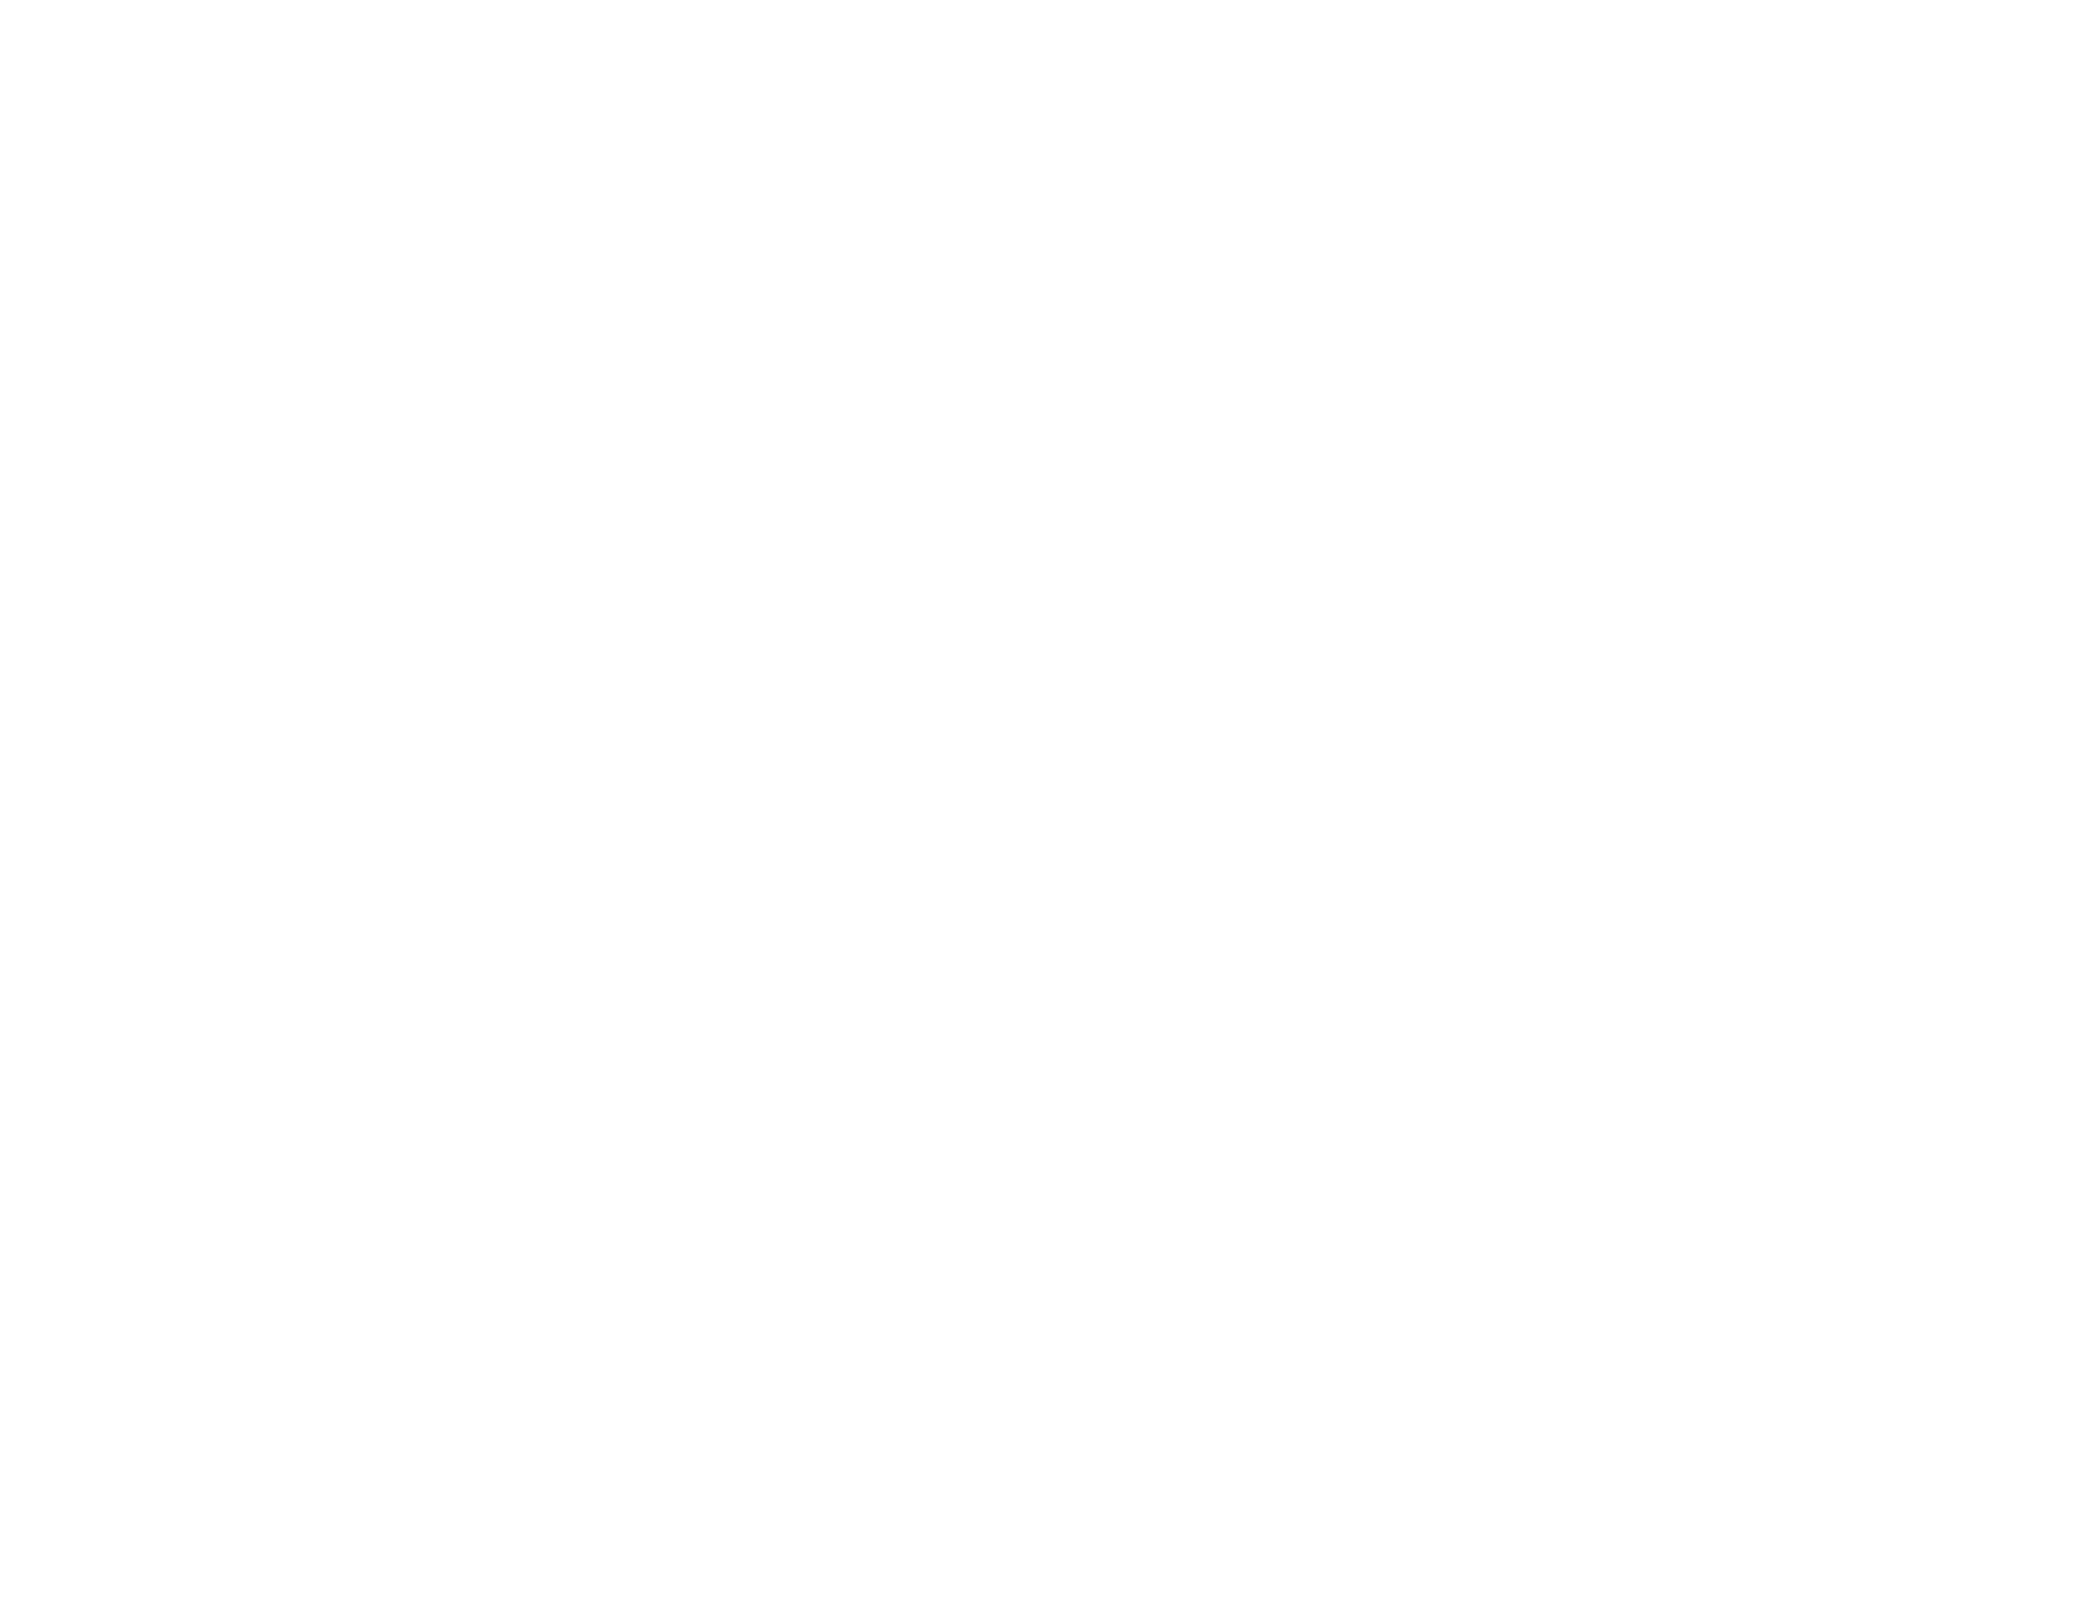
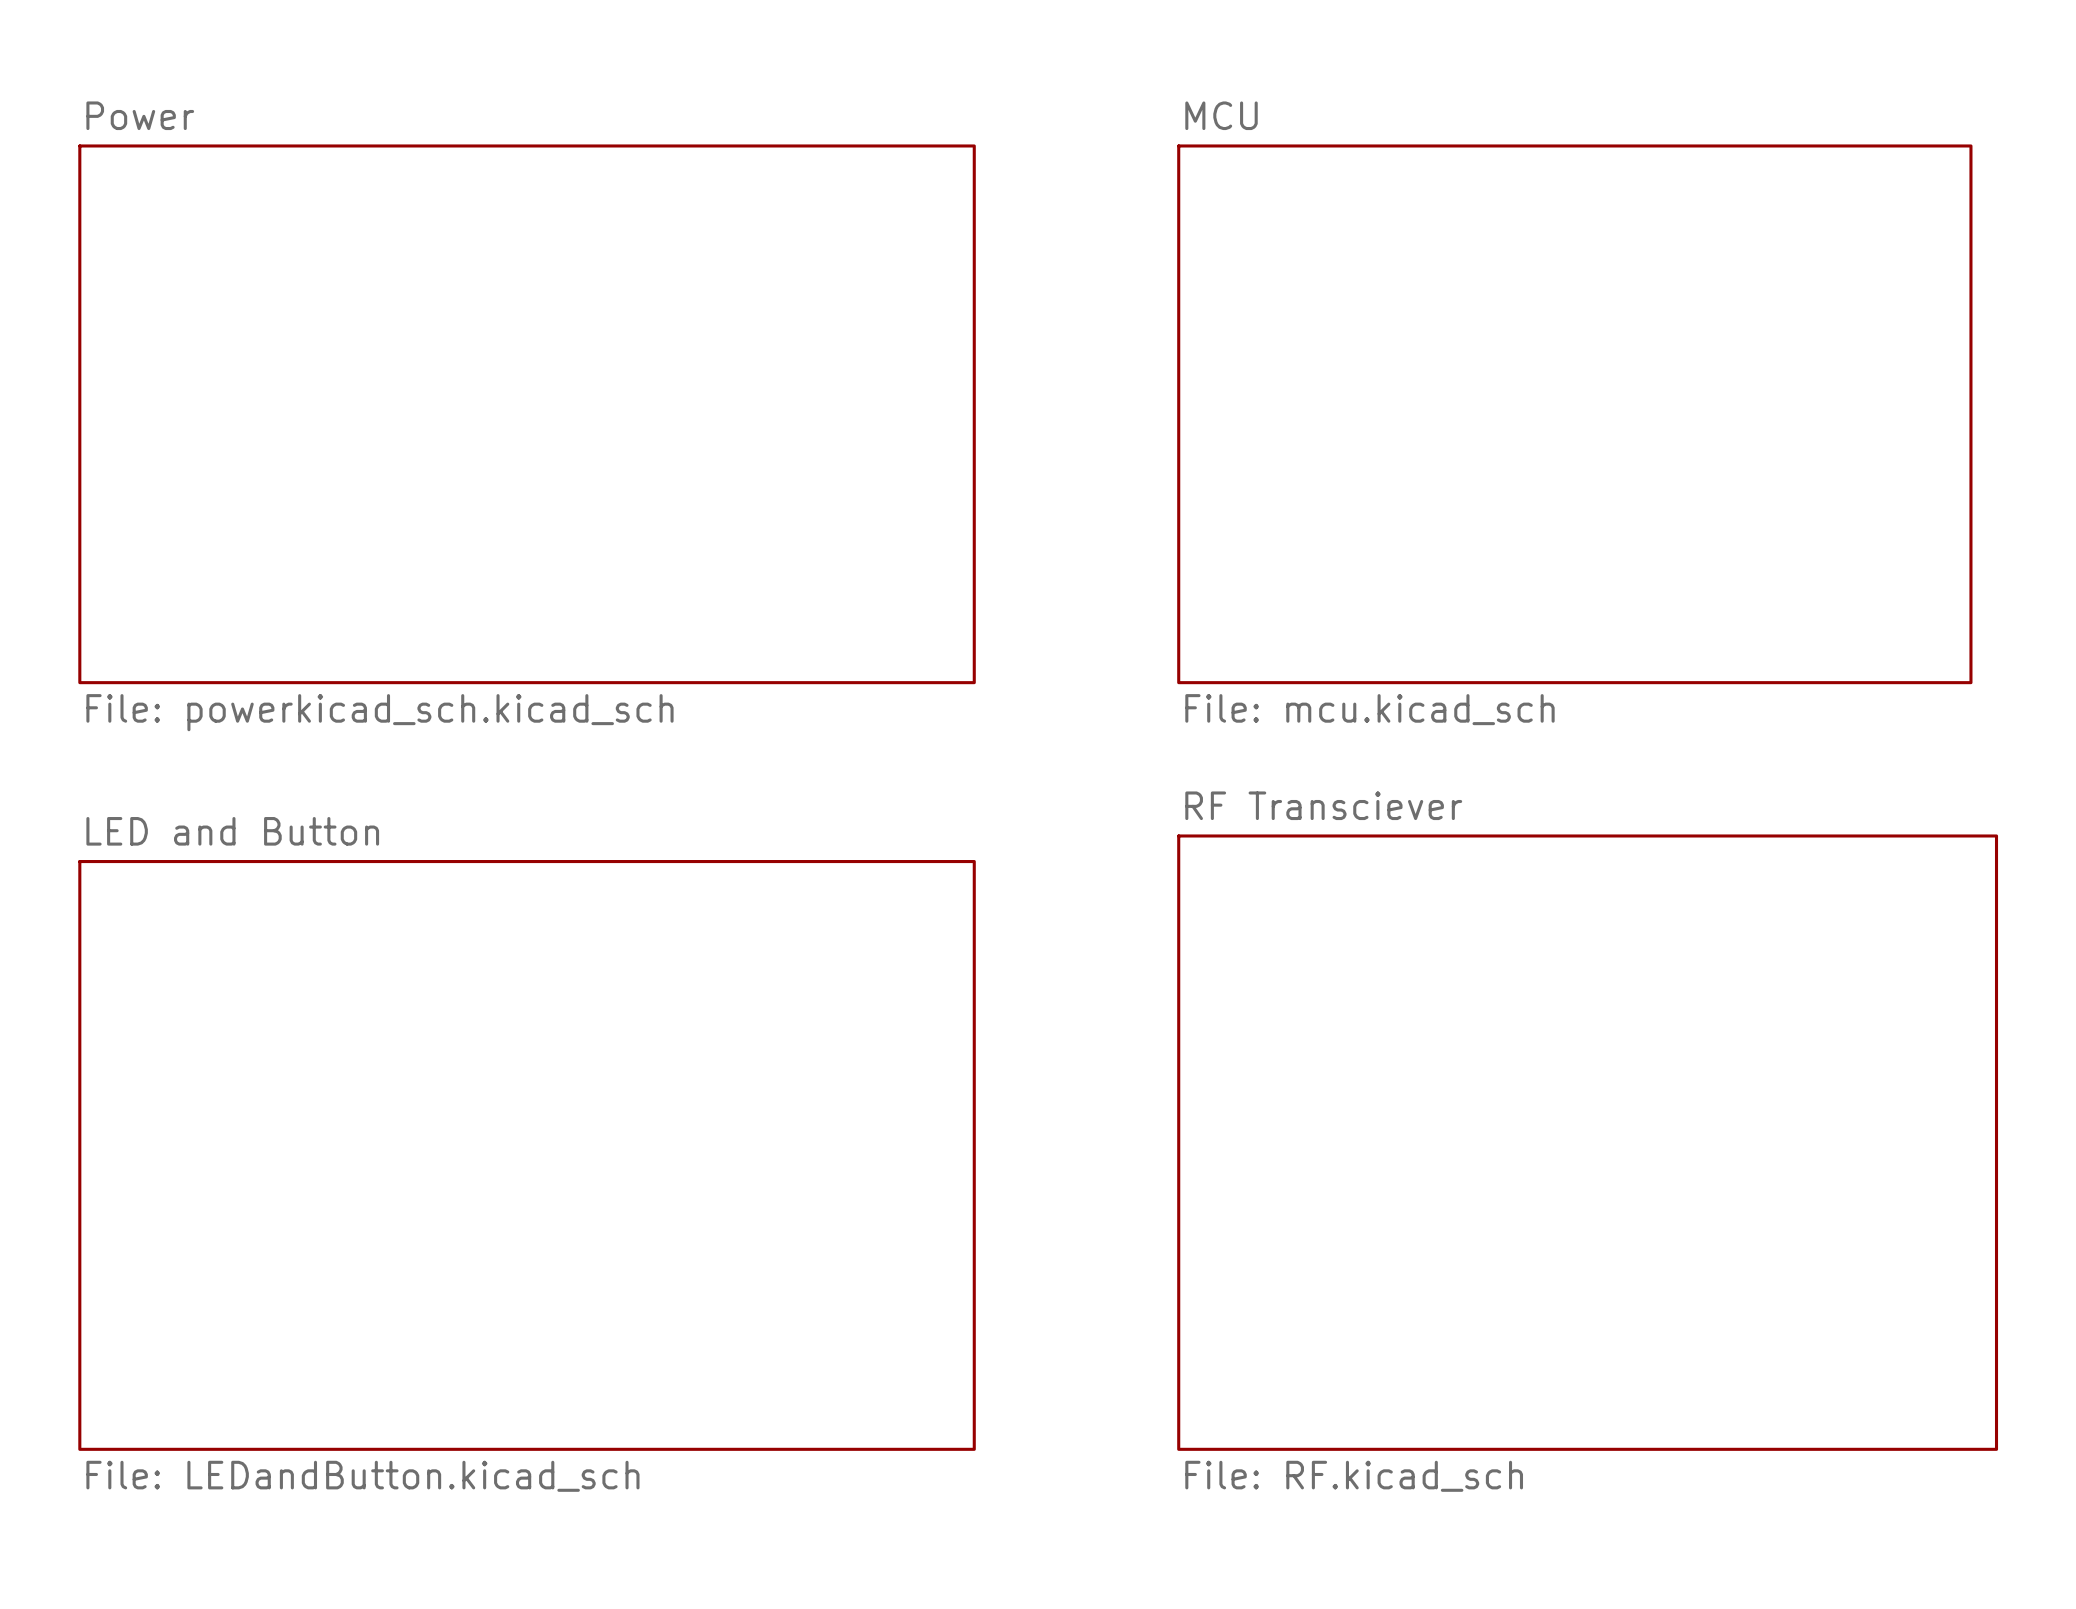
sheet Power: none -> File: powerkicad_sch.kicad_sch (527, 414)
sheet MCU: none -> File: mcu.kicad_sch (1574, 414)
sheet RF Transciever: none -> File: RF.kicad_sch (1587, 1142)
sheet LED and Button: none -> File: LEDandButton.kicad_sch (527, 1155)

